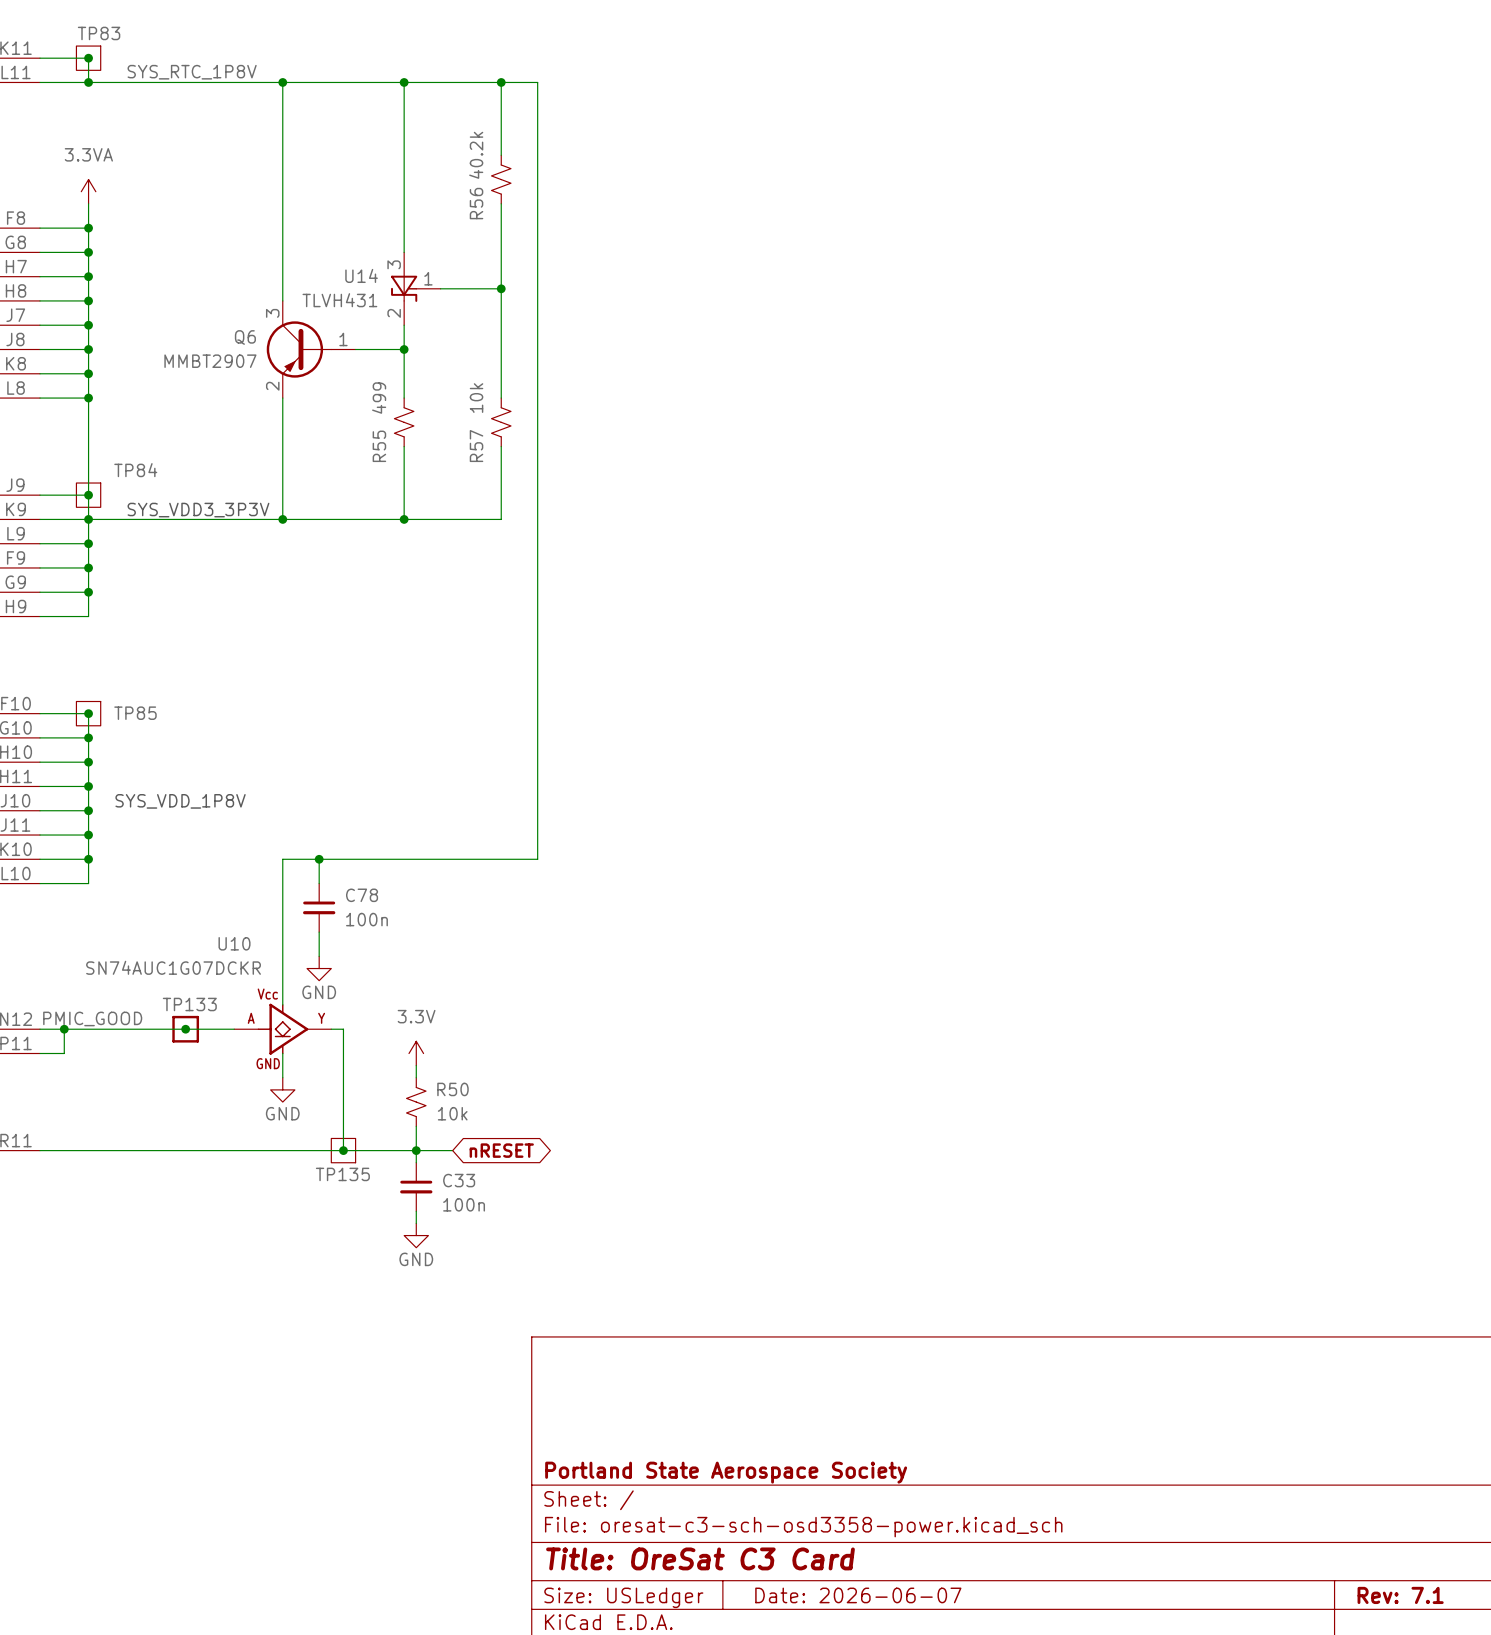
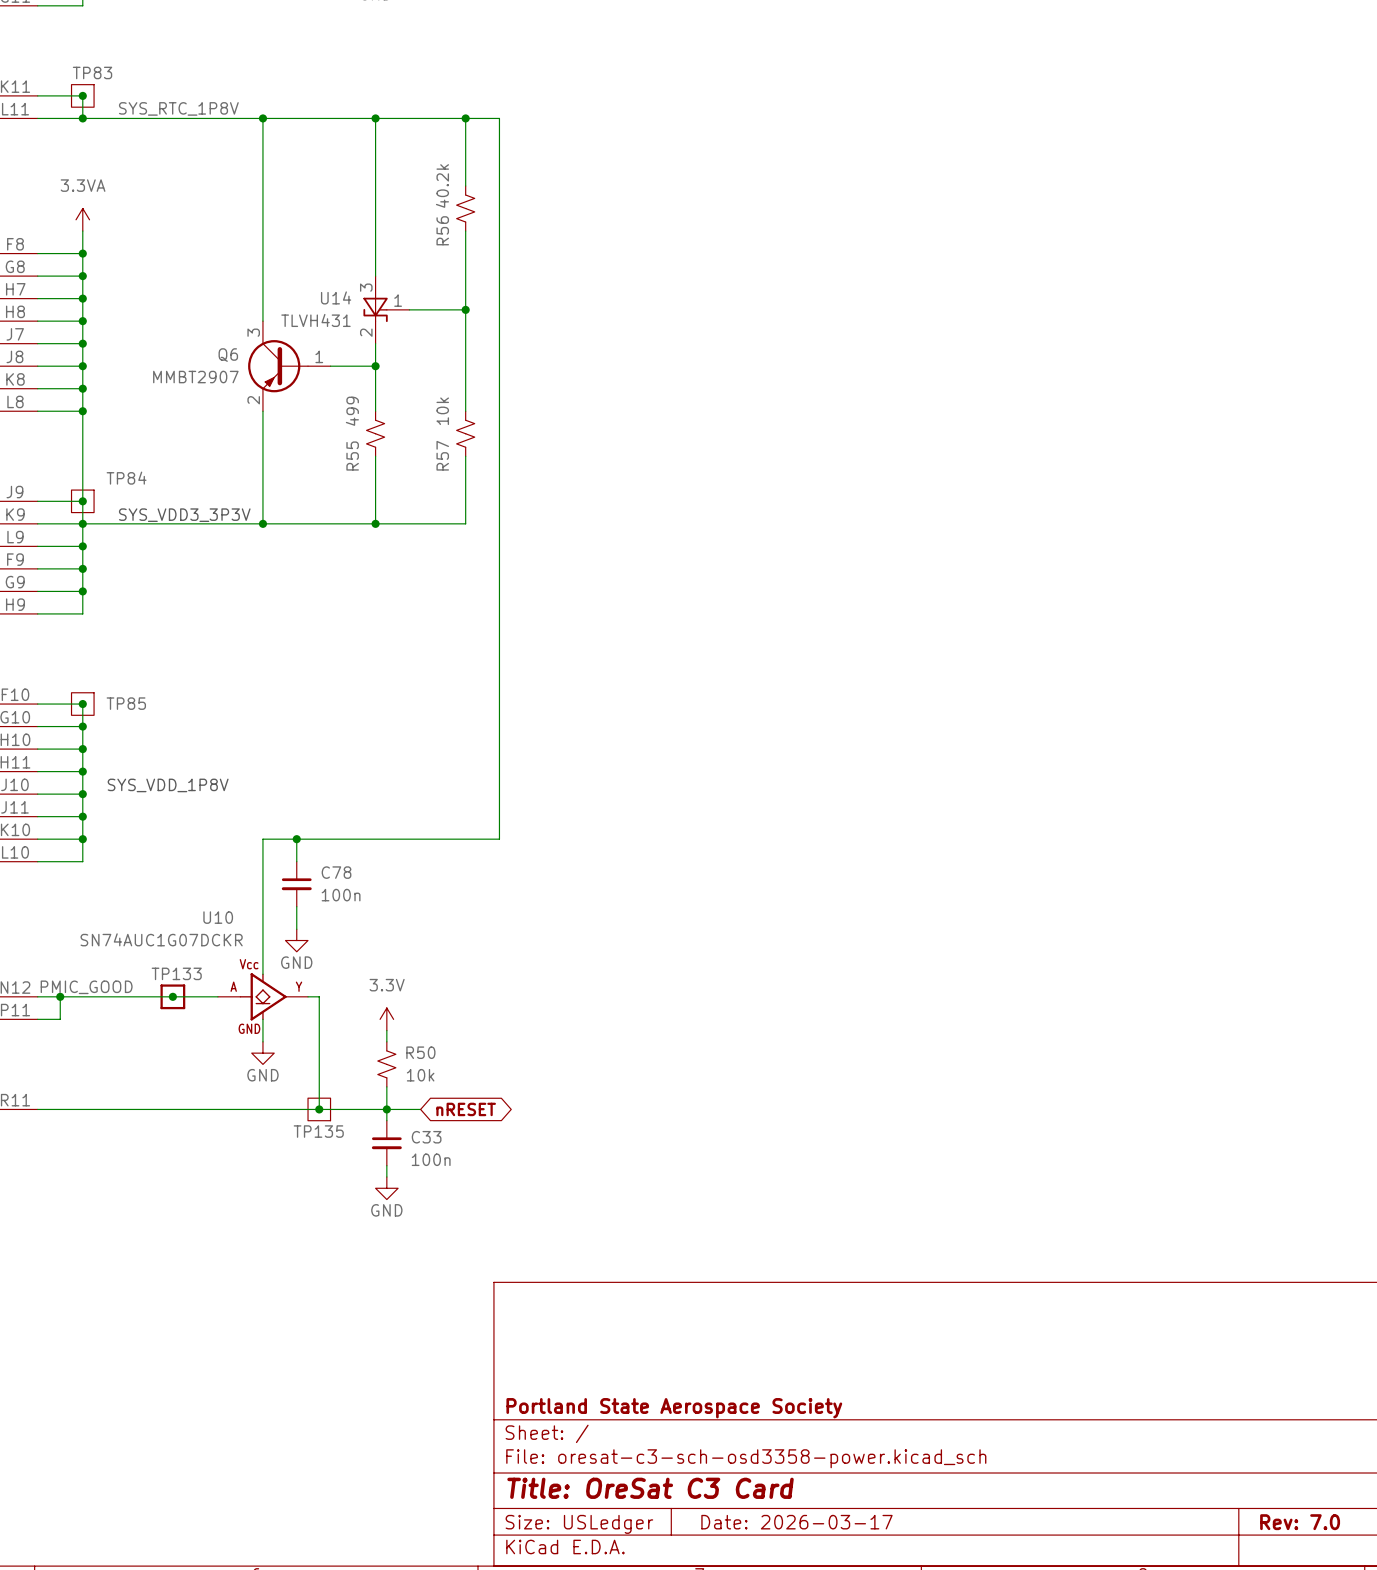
title block: Date: 2026-06-07 (858, 1595) -> Date: 2026-03-17 (796, 1522)
title block: Rev: 7.1 (1400, 1595) -> Rev: 7.0 (1300, 1522)

